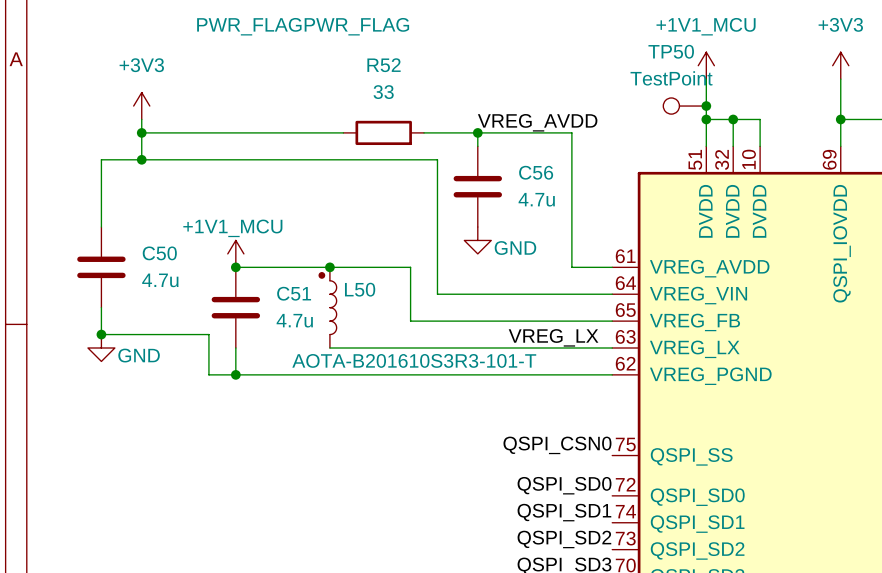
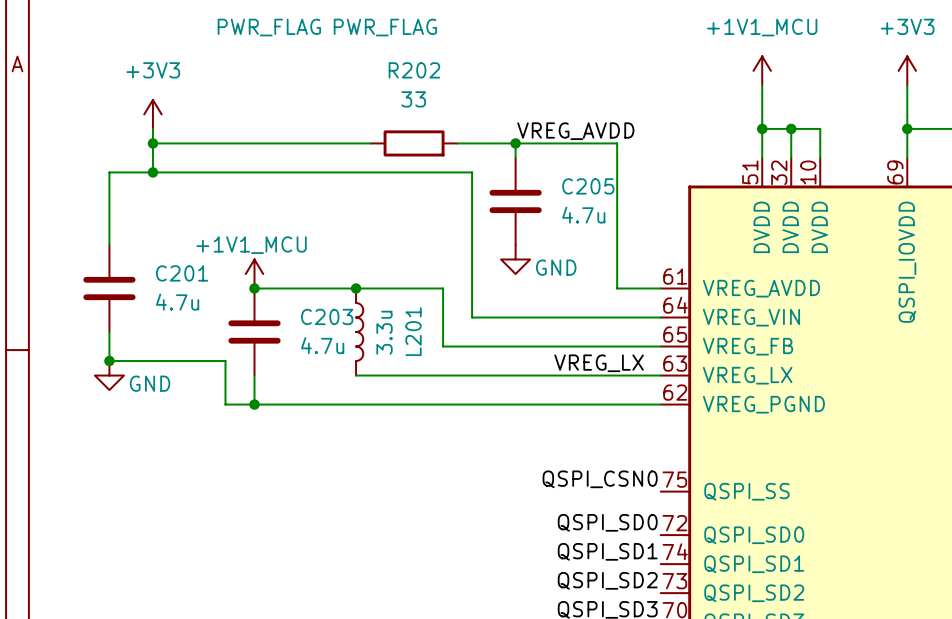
R52 name: R52 (384, 65) -> R202 (414, 70)
TP50: TestPoint (684, 106) -> none
junction: (706, 106) -> none
C56 name: C56 (536, 172) -> C205 (588, 186)
C50 name: C50 (159, 253) -> C201 (182, 273)
C51 name: C51 (294, 293) -> C203 (327, 316)
L50: AOTA-B201610S3R3-101-T (327, 307) -> none
L201: none -> 3.3u (359, 332)

